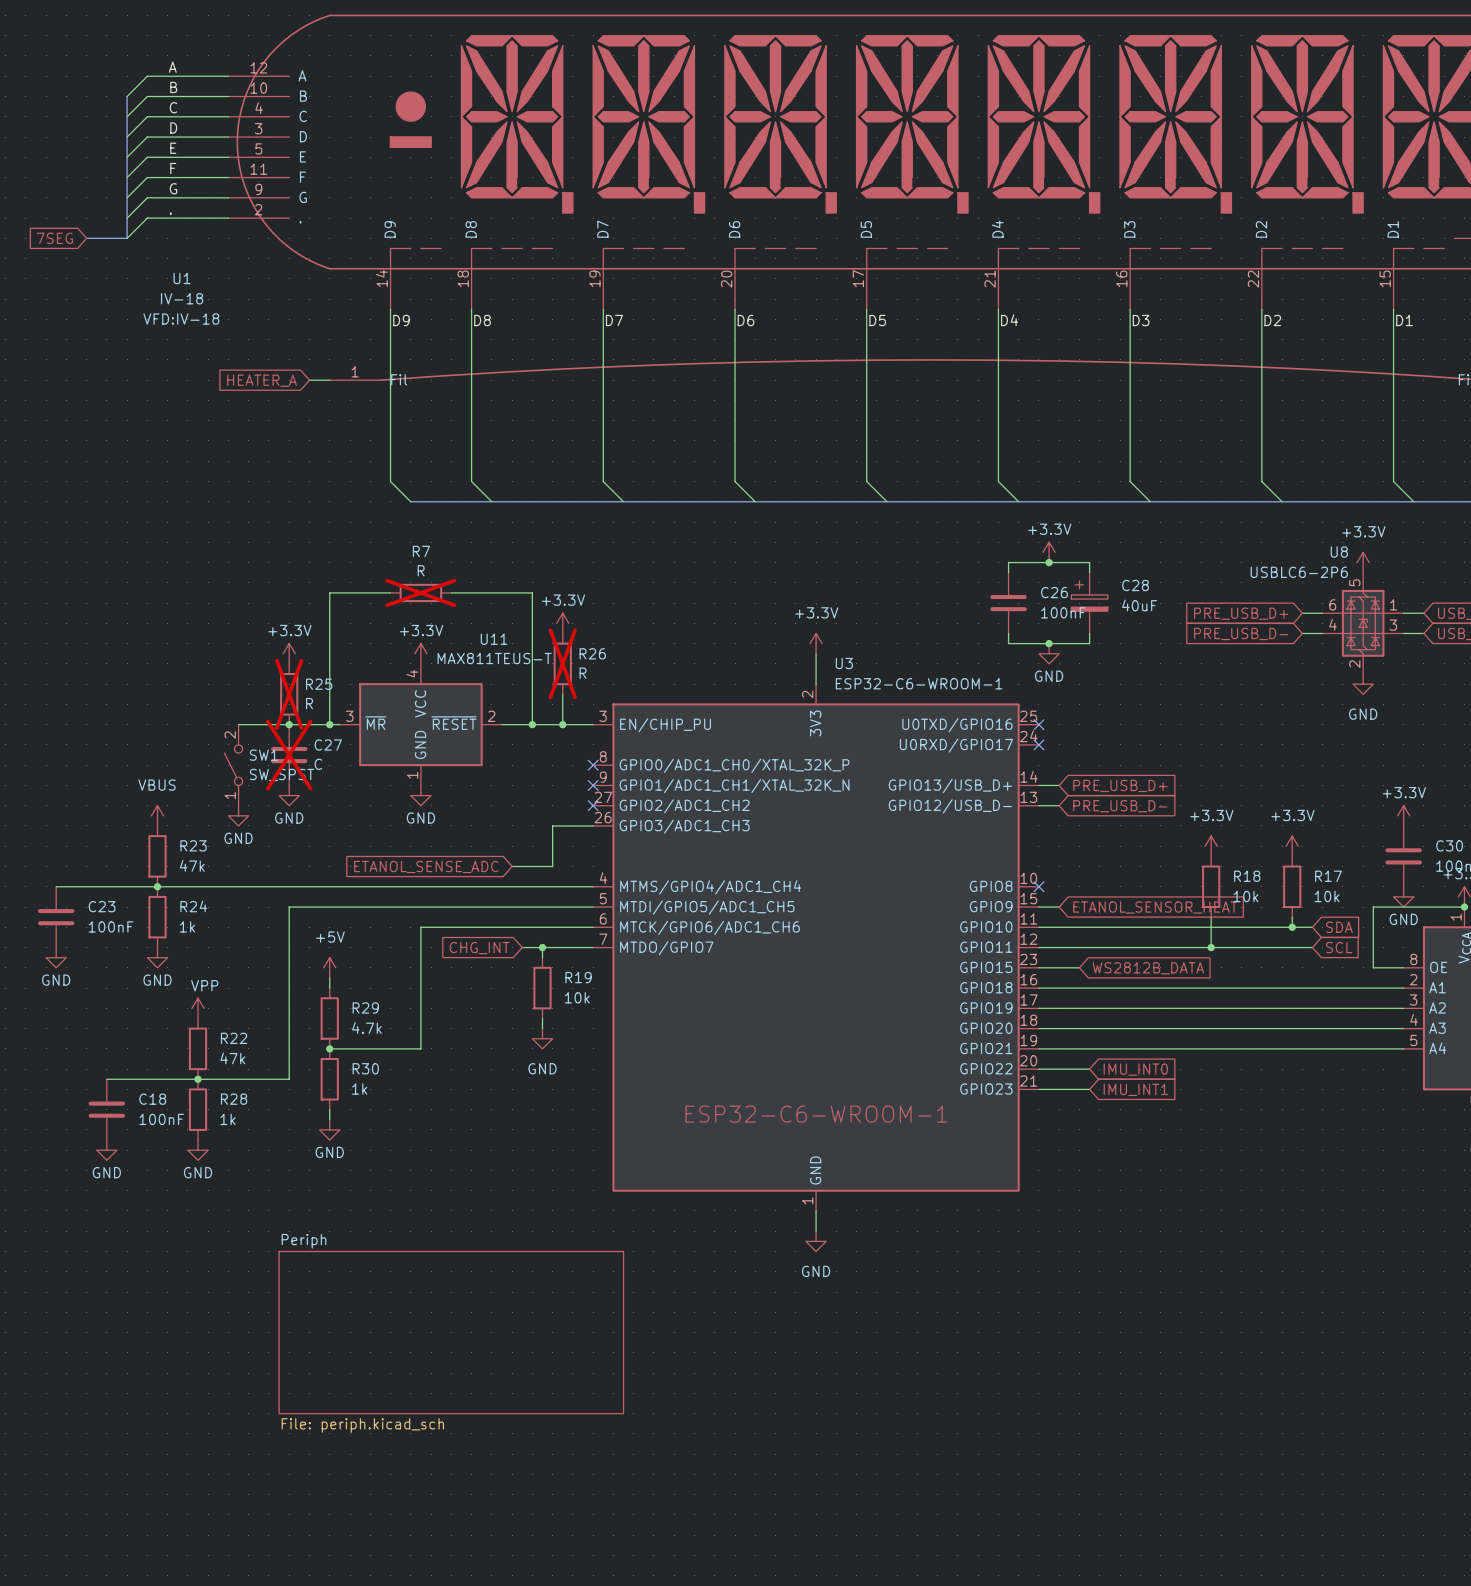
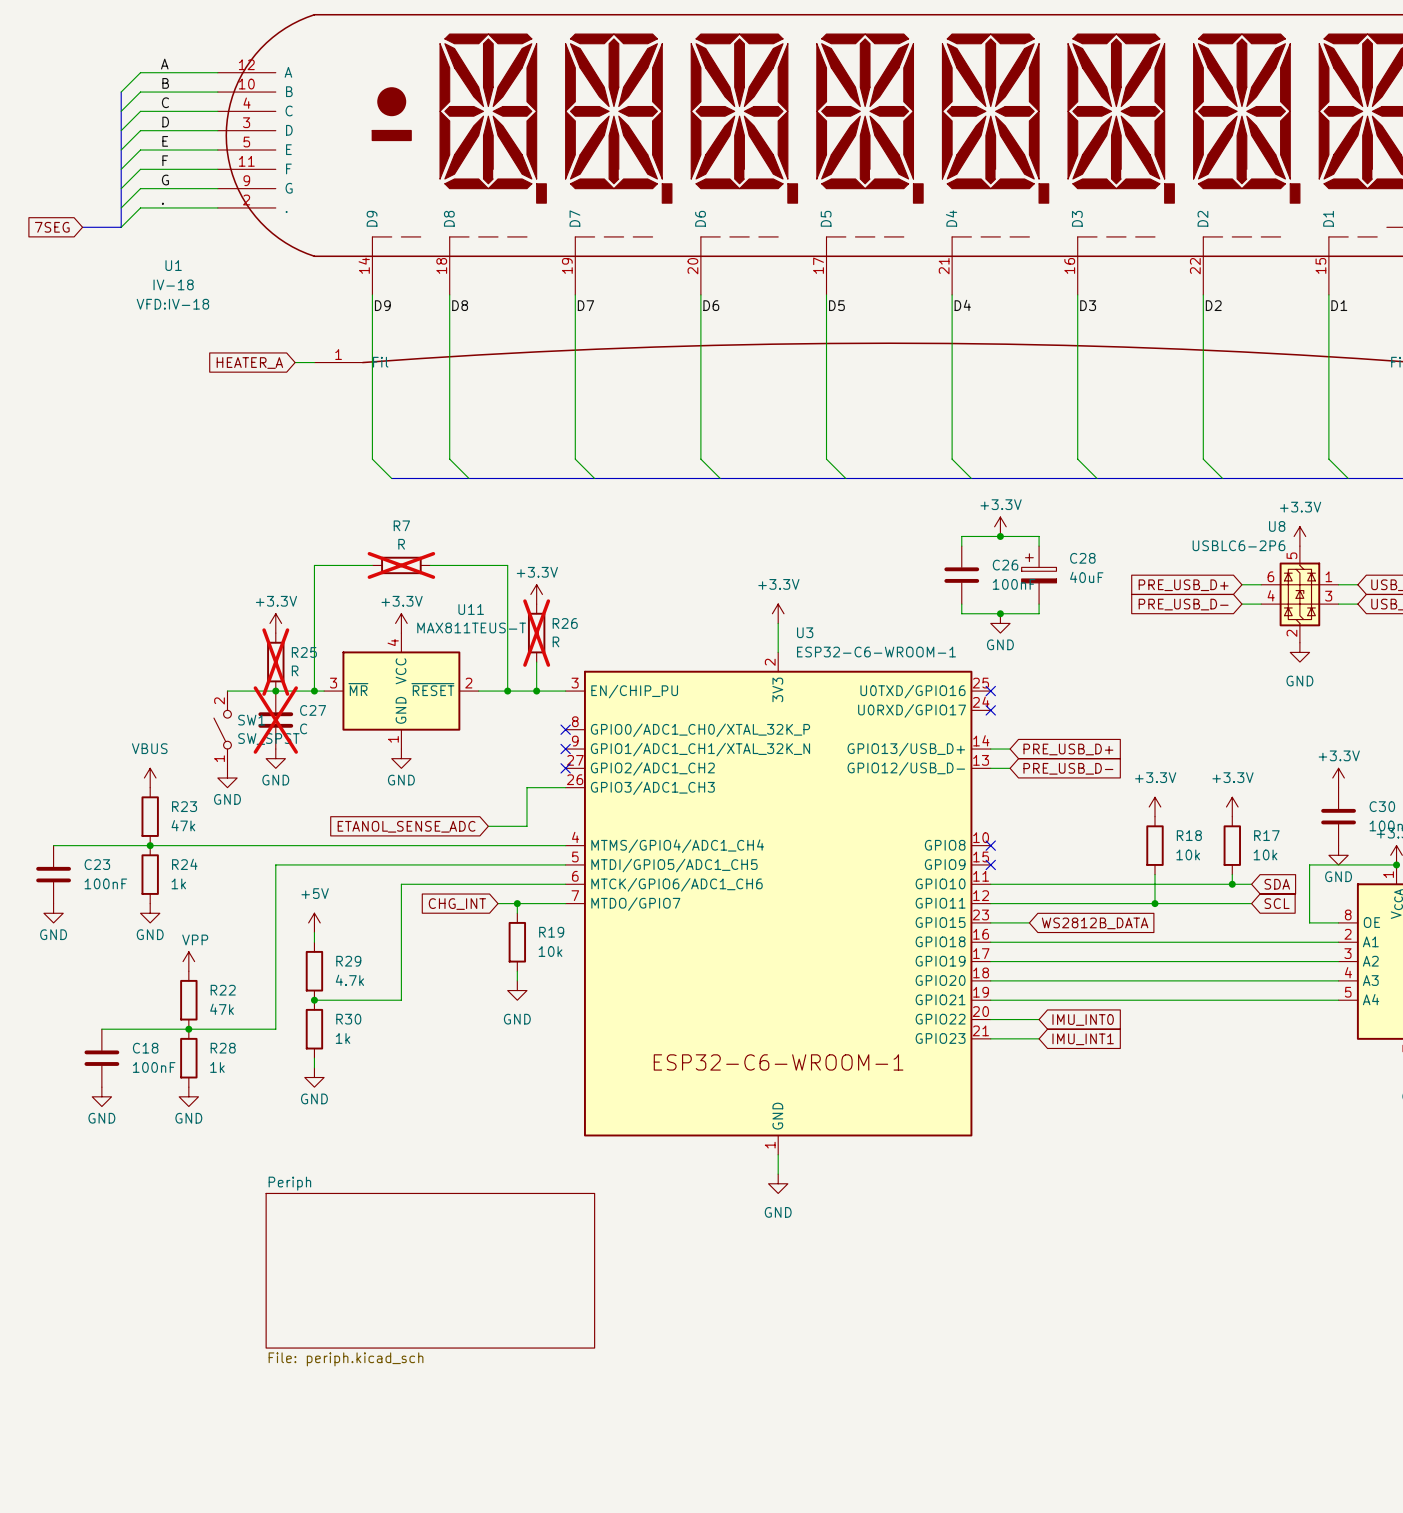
wire: (1038, 907) (1059, 907) -> none
no-connect mark: none -> (990, 864)
global label: ETANOL_SENSOR_HEAT (1155, 907) -> none

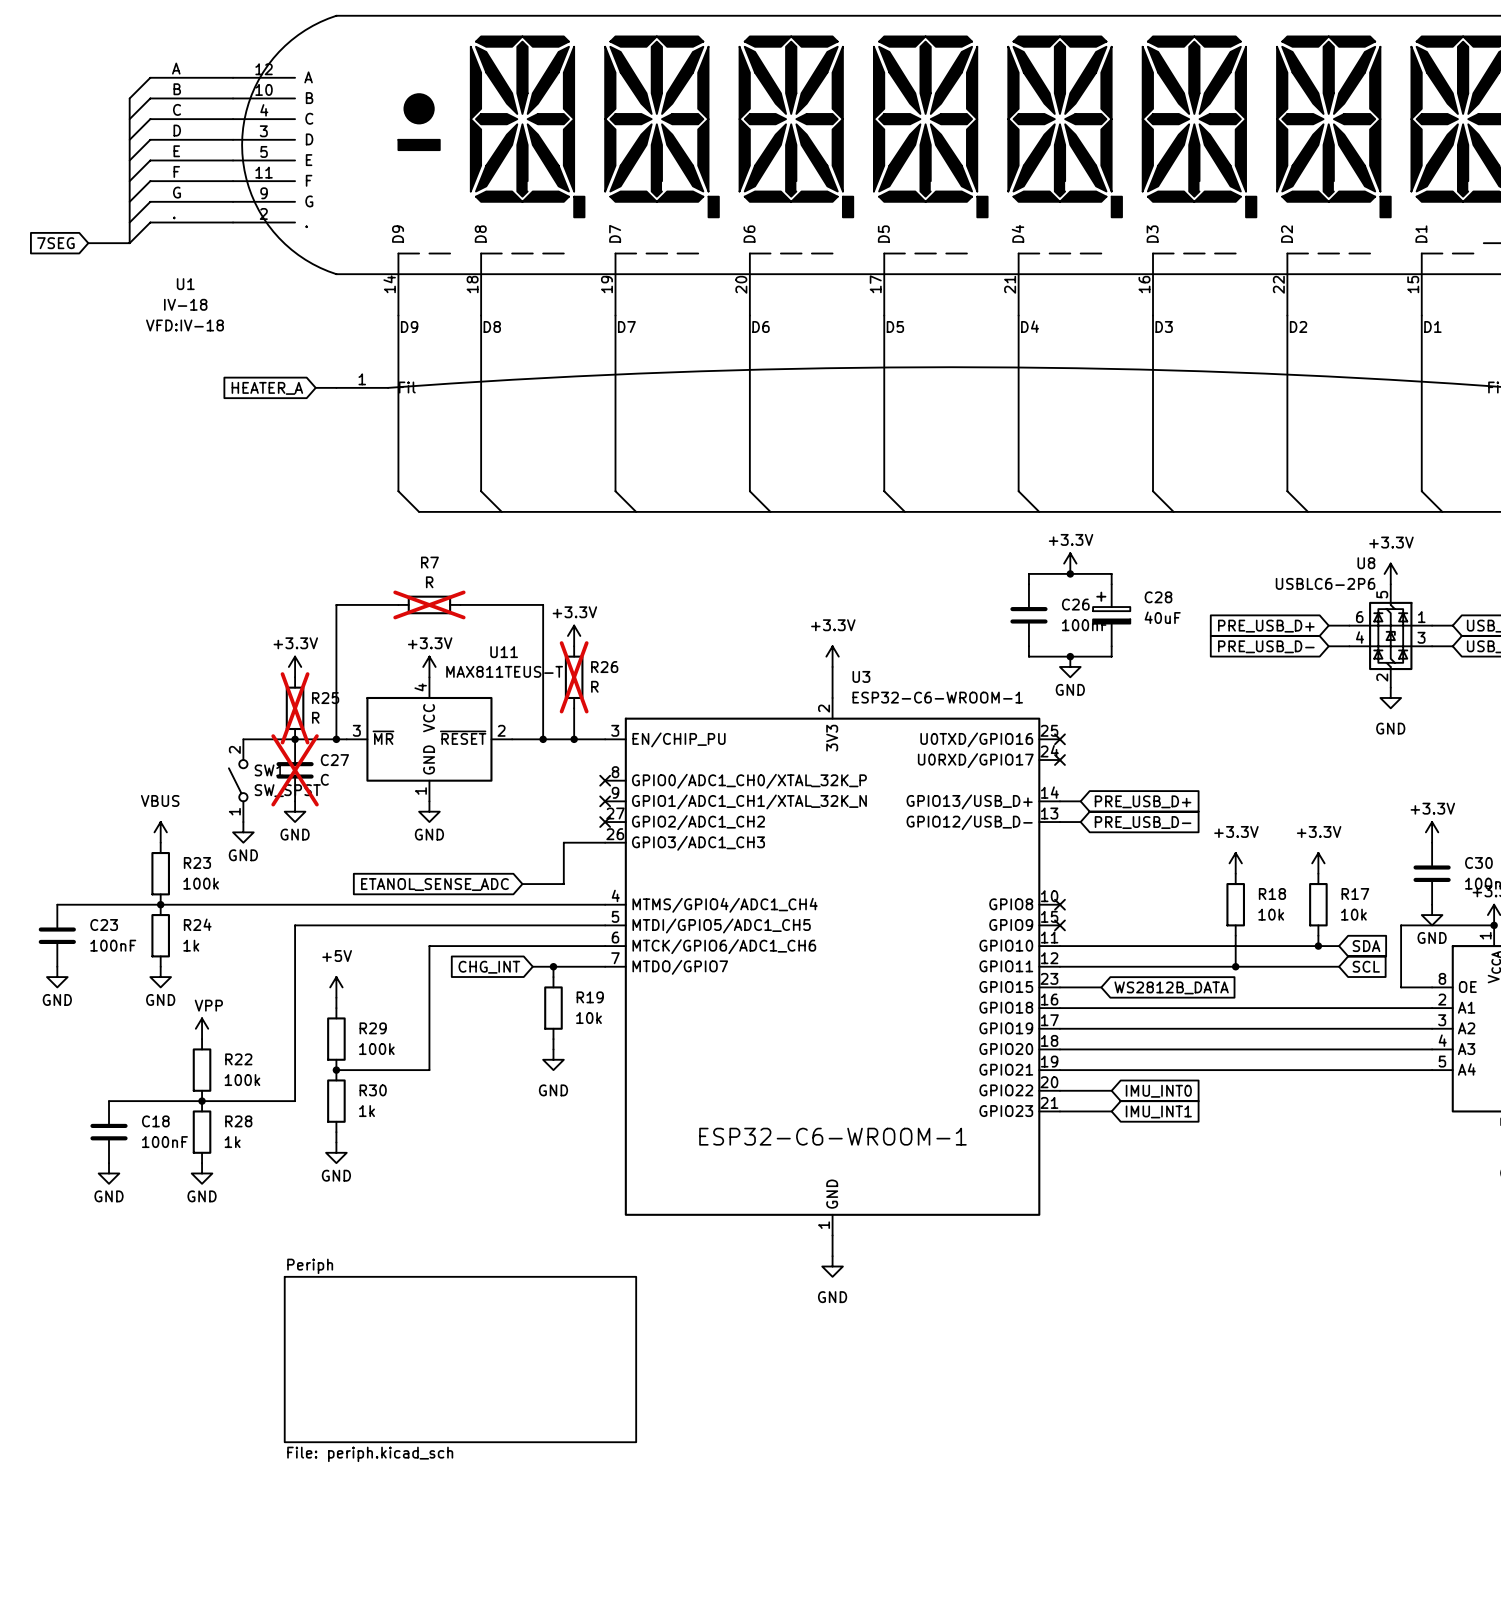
R23 value: 47k (183, 825) -> 100k (201, 883)
R29 value: 4.7k (349, 980) -> 100k (376, 1049)
R22 value: 47k (222, 1009) -> 100k (242, 1080)

